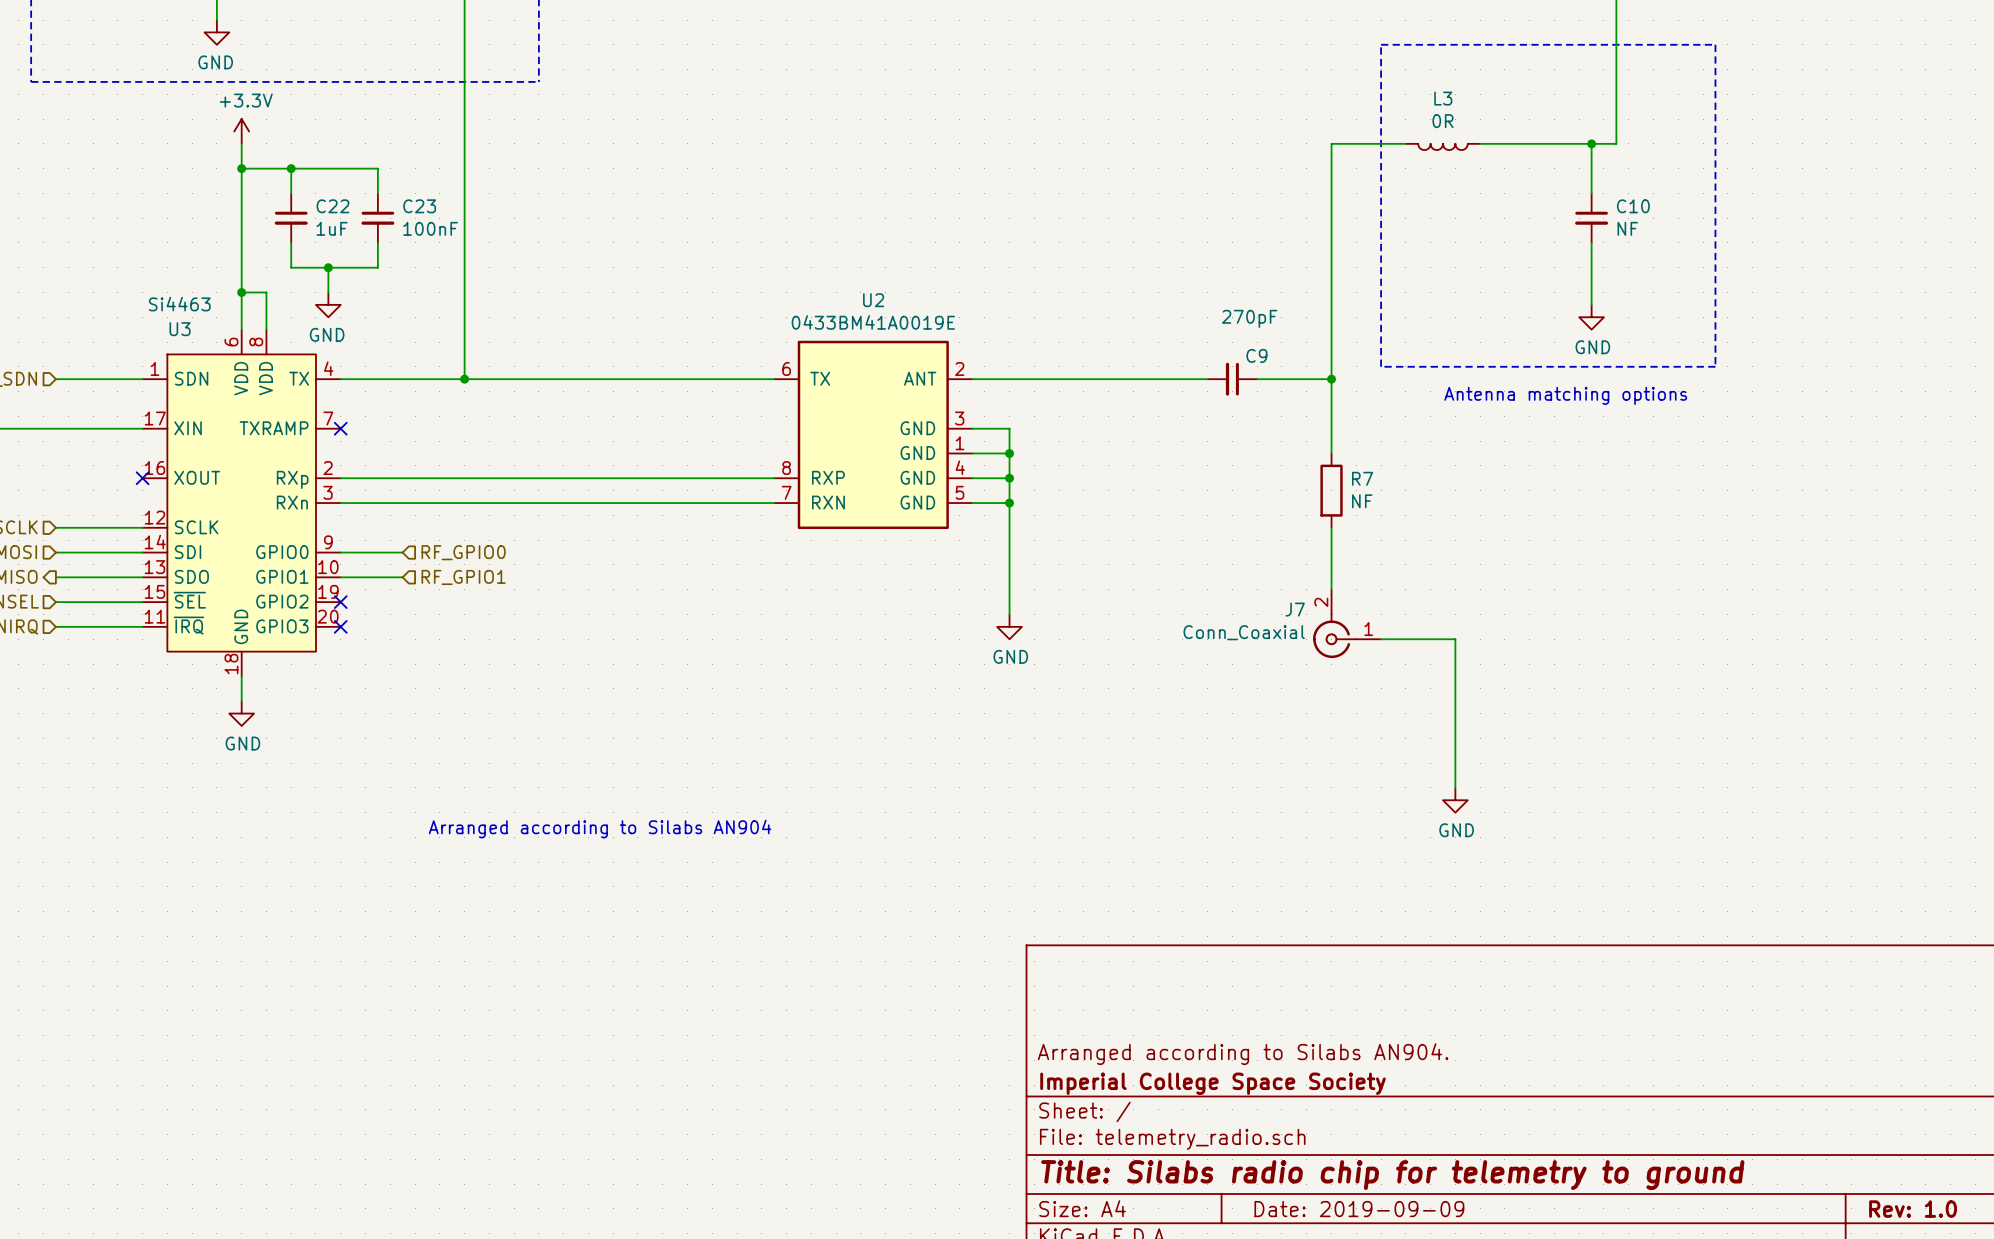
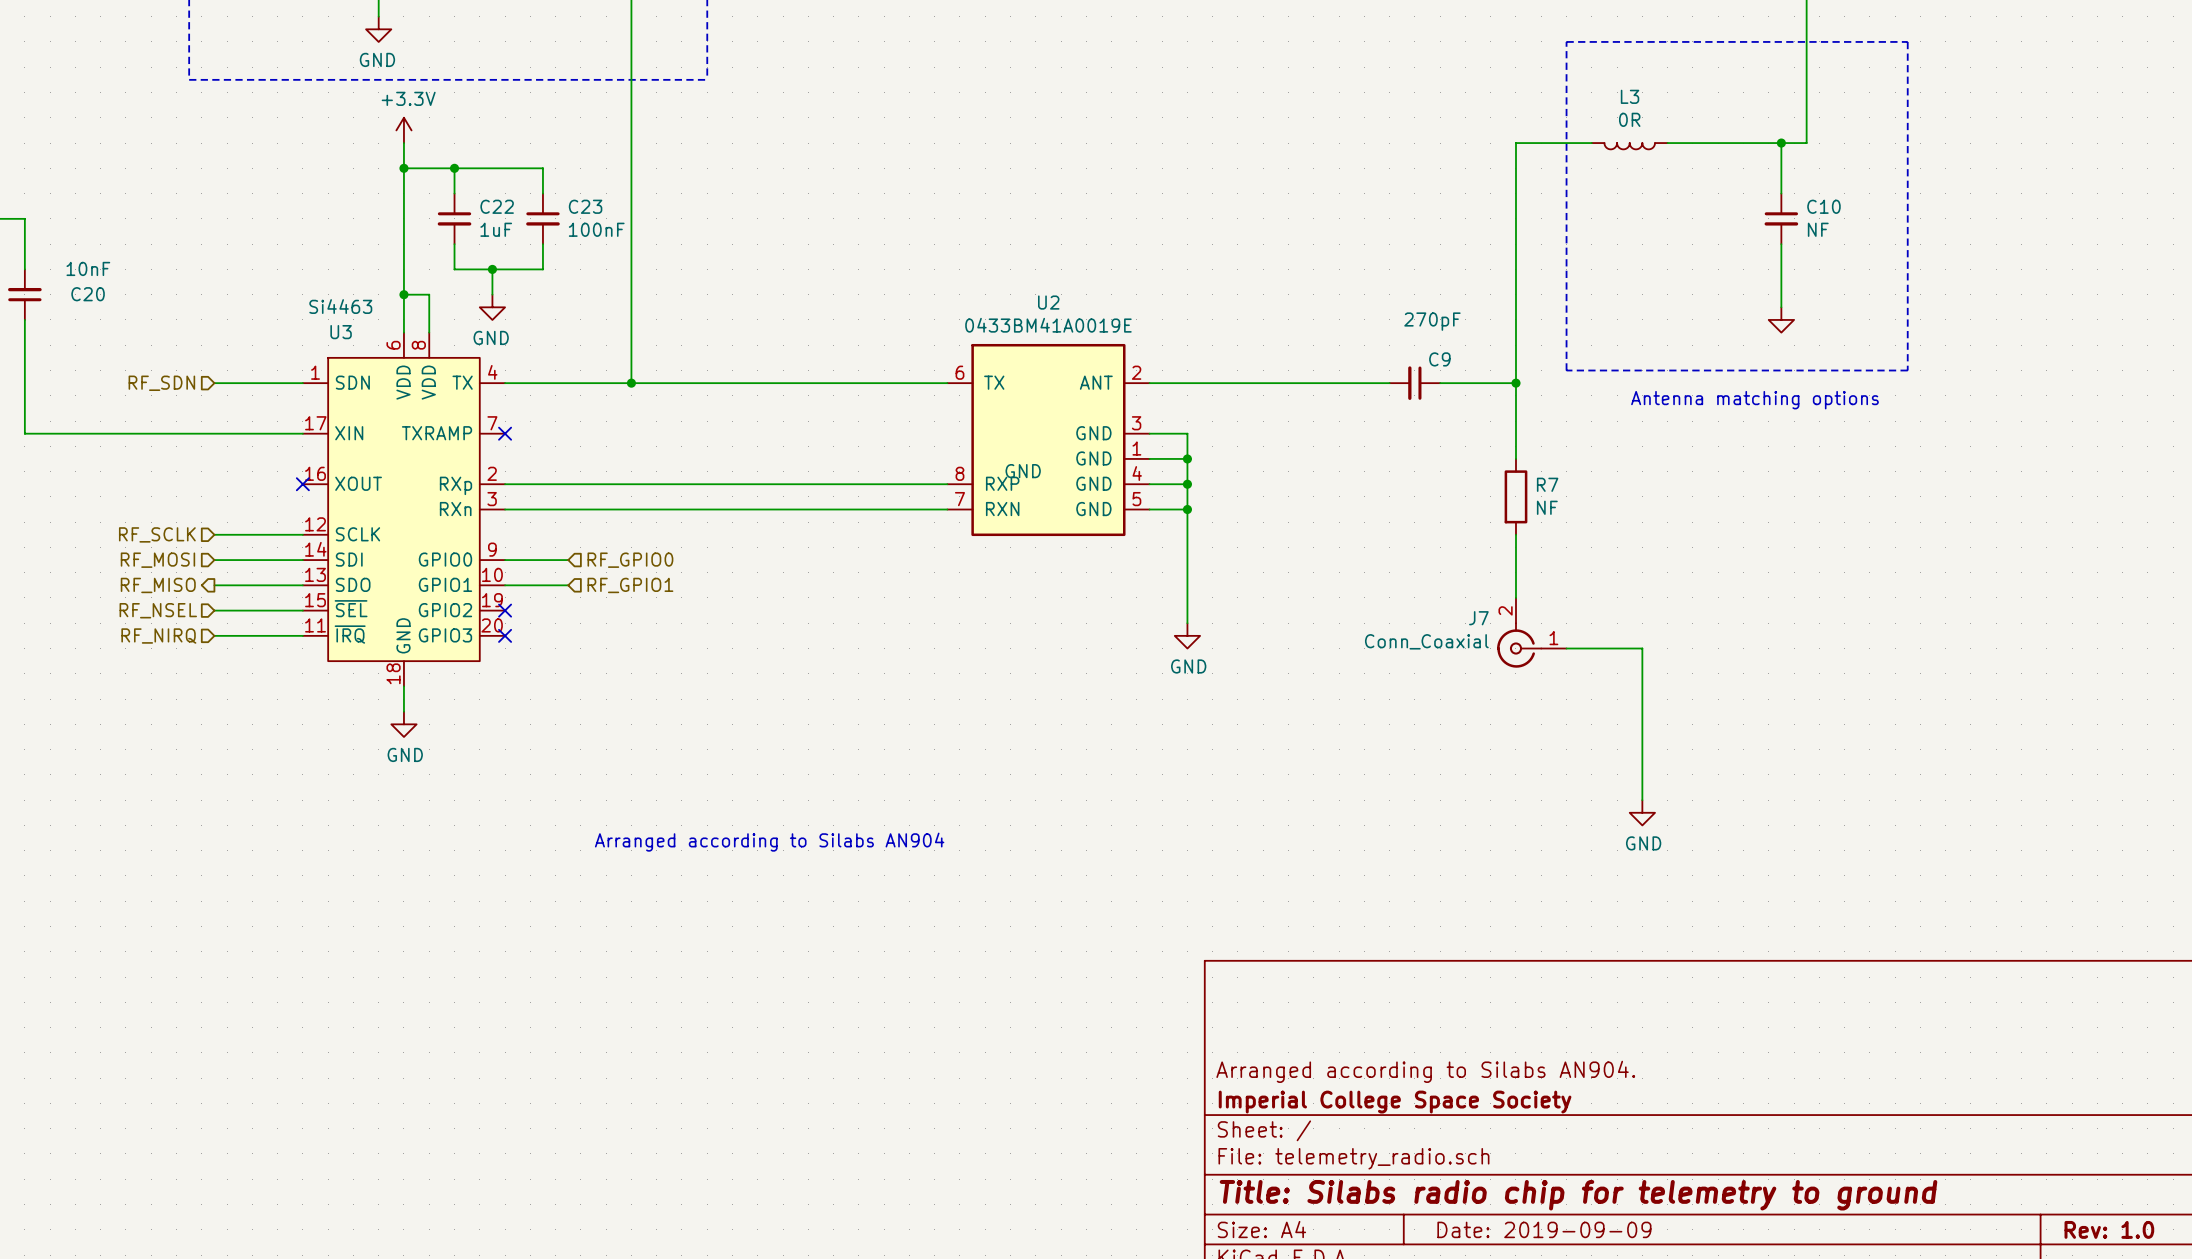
power symbol text position: GND (1592, 347) -> GND (1023, 471)

